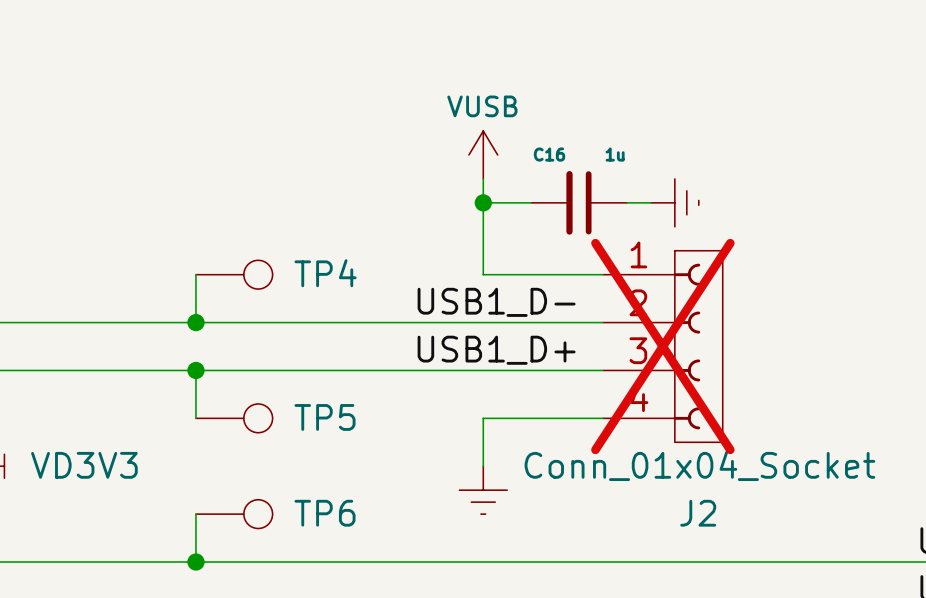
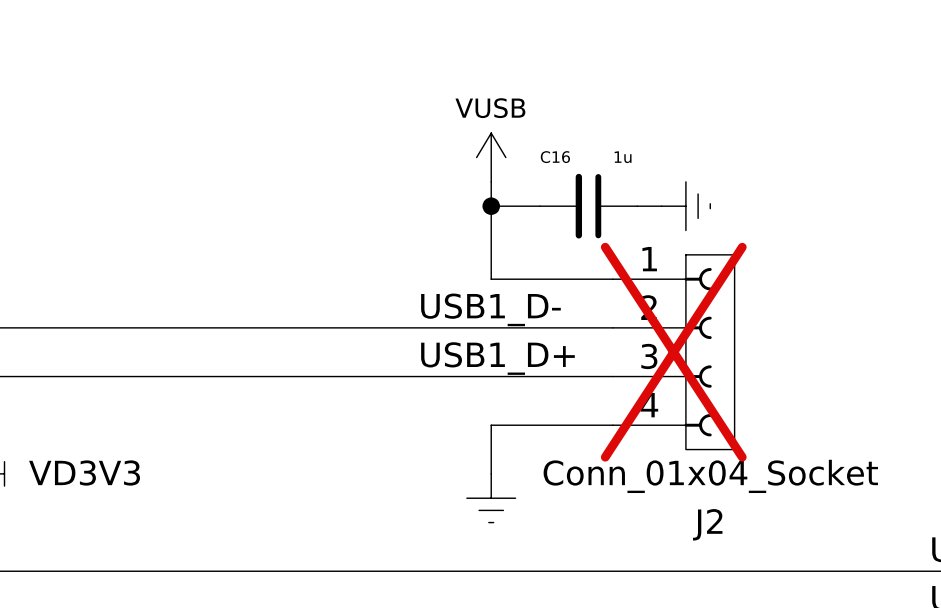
wire: (195, 274) (195, 322) -> none
TP4: (234, 274) -> none
junction: (195, 322) -> none
wire: (195, 370) (195, 418) -> none
junction: (195, 370) -> none
TP5: (234, 418) -> none
wire: (195, 514) (195, 562) -> none
TP6: (234, 514) -> none
junction: (195, 562) -> none

